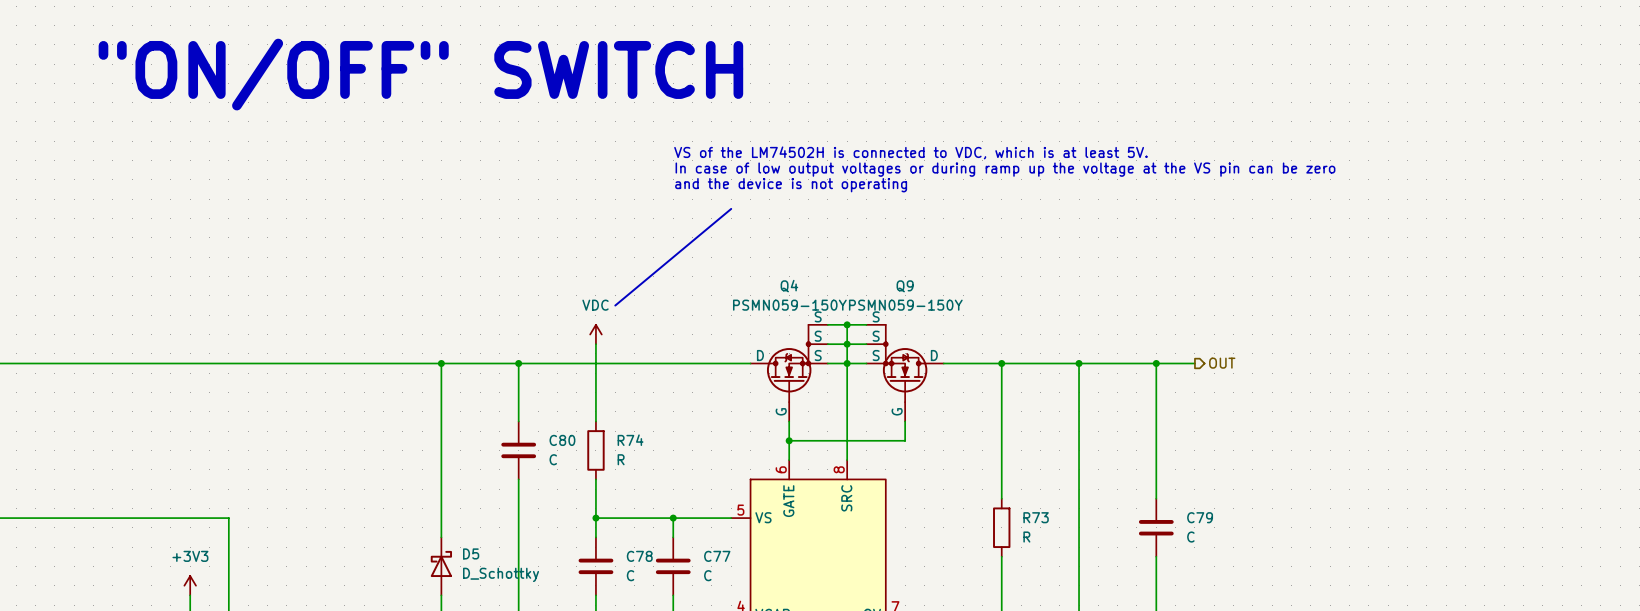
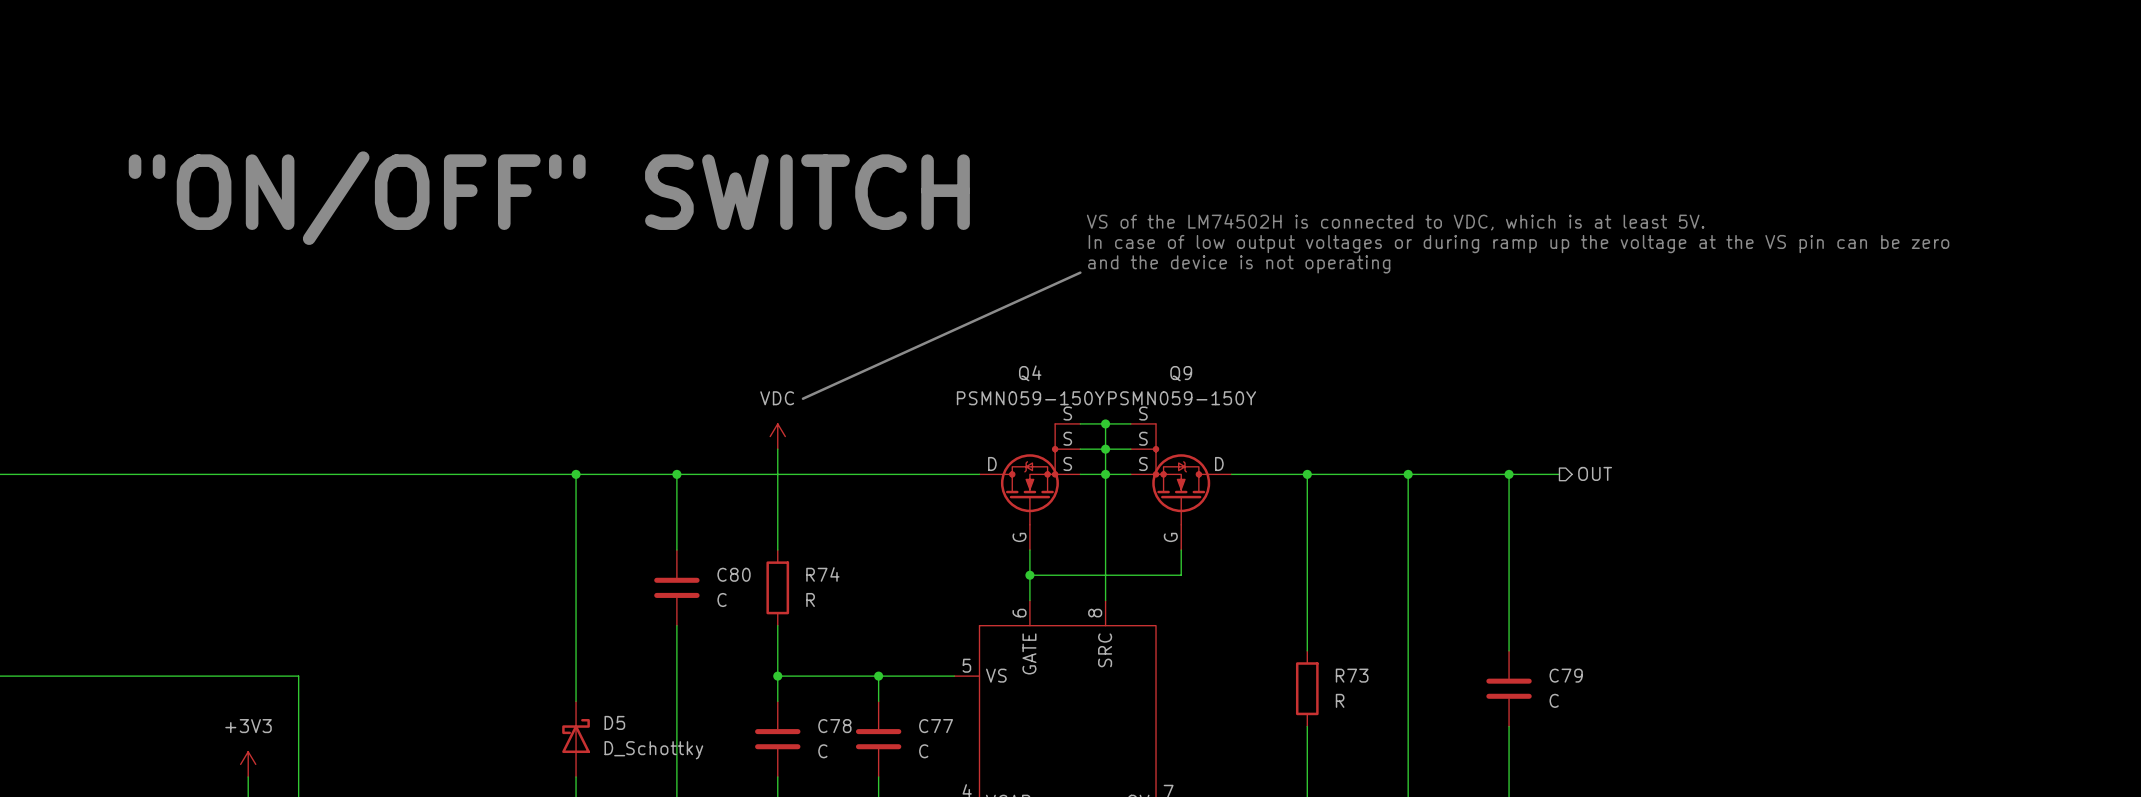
text position: "ON/OFF" SWITCH (420, 74) -> "ON/OFF" SWITCH (549, 198)
text position: VS of the LM74502H is connected to VDC, which is at least 5V. (910, 152) -> VS of the LM74502H is connected to VDC, which is at least 5V. (1395, 222)
text position: In case of low output voltages or during ramp up the voltage at the VS pin can be zero (1005, 169) -> In case of low output voltages or during ramp up the voltage at the VS pin can be zero (1518, 244)
text position: and the device is not operating (791, 185) -> and the device is not operating (1239, 264)
line: (731, 208) (615, 305) -> (1080, 272) (802, 398)

